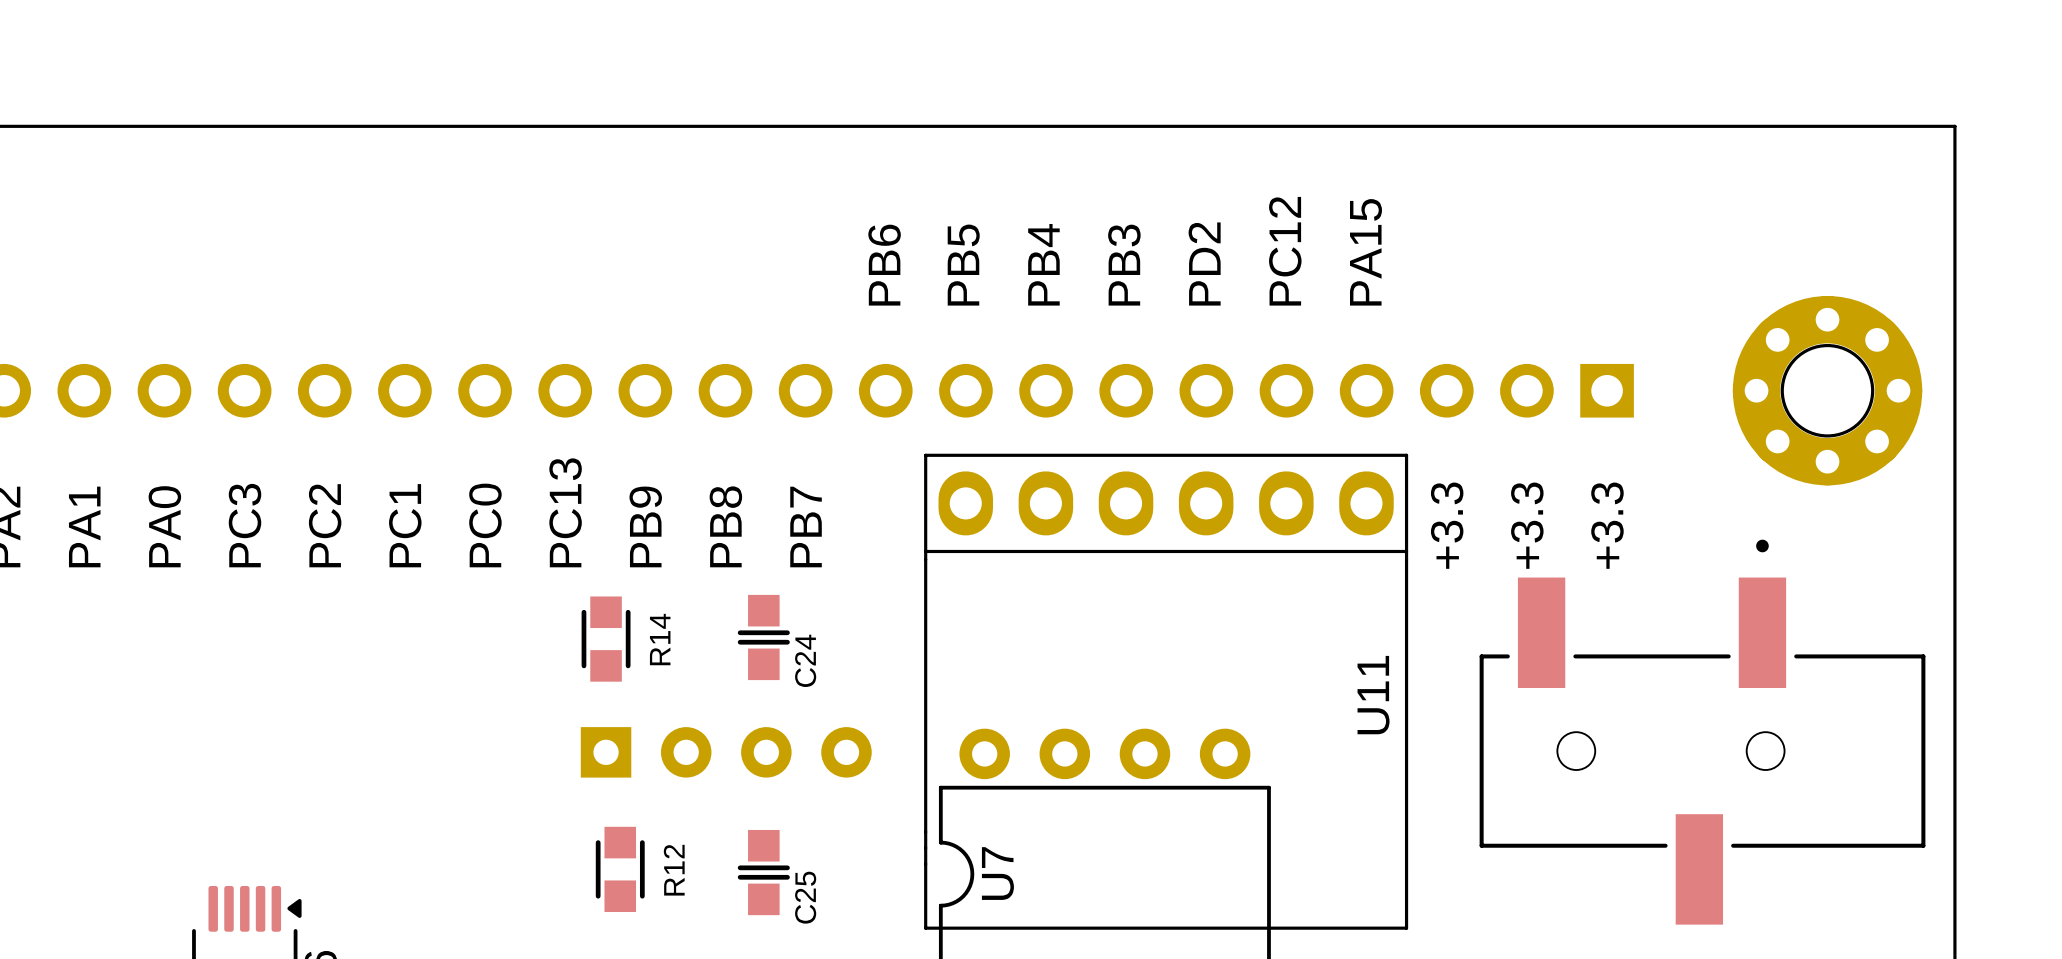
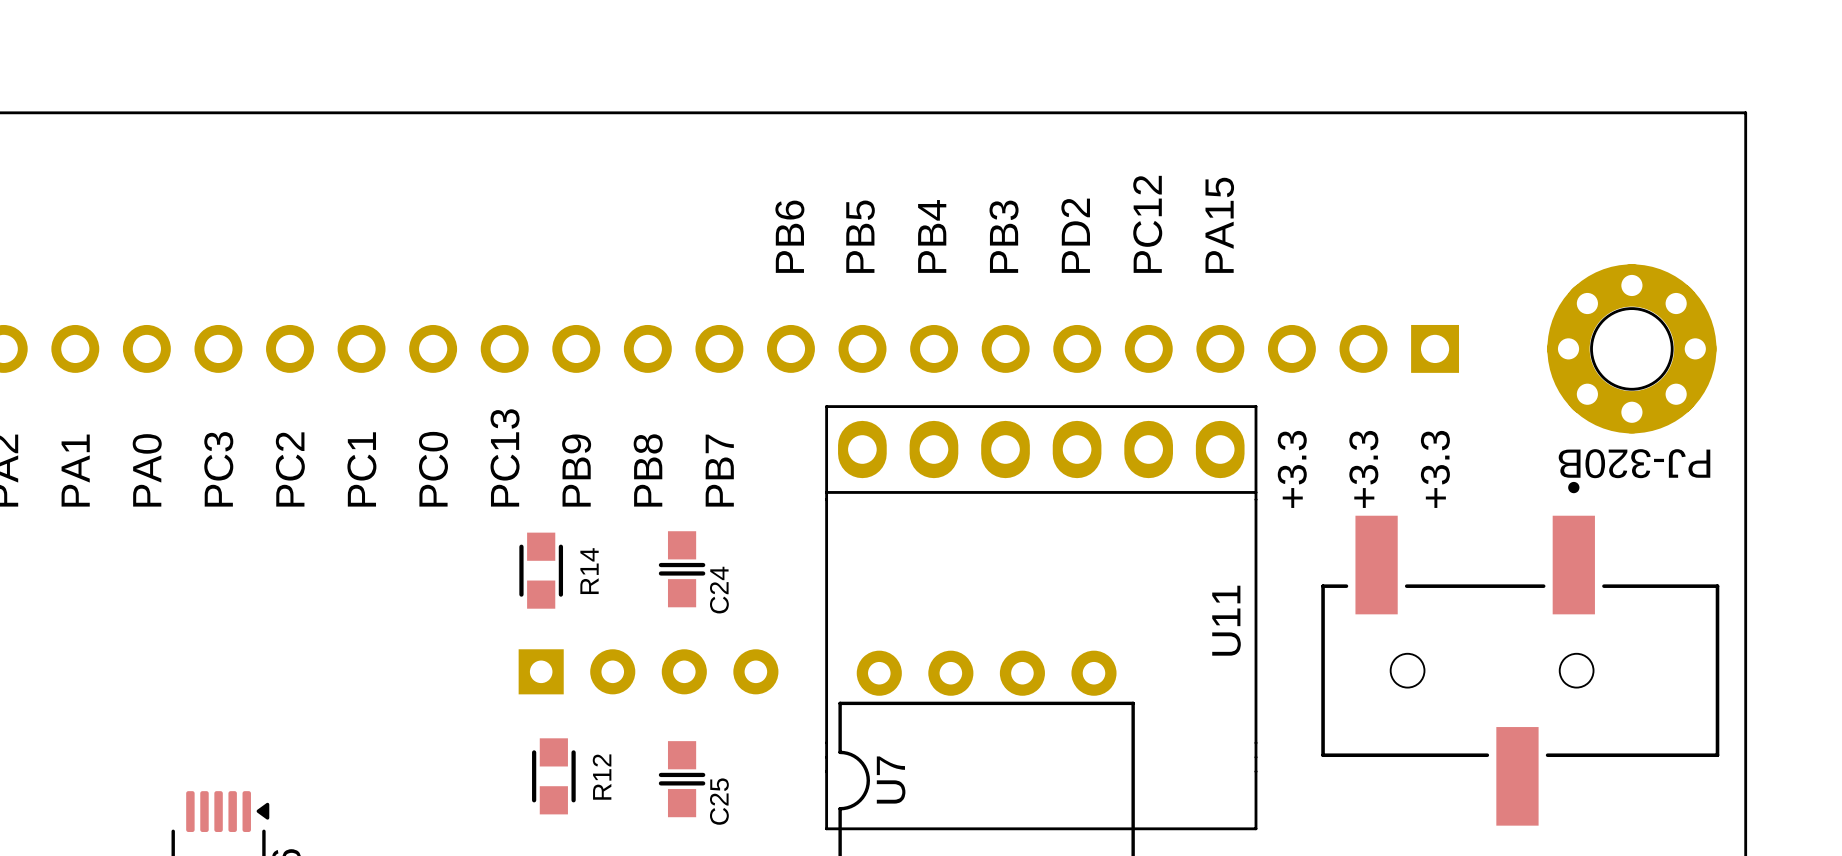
part value: none -> PJ-320B (1634, 463)

